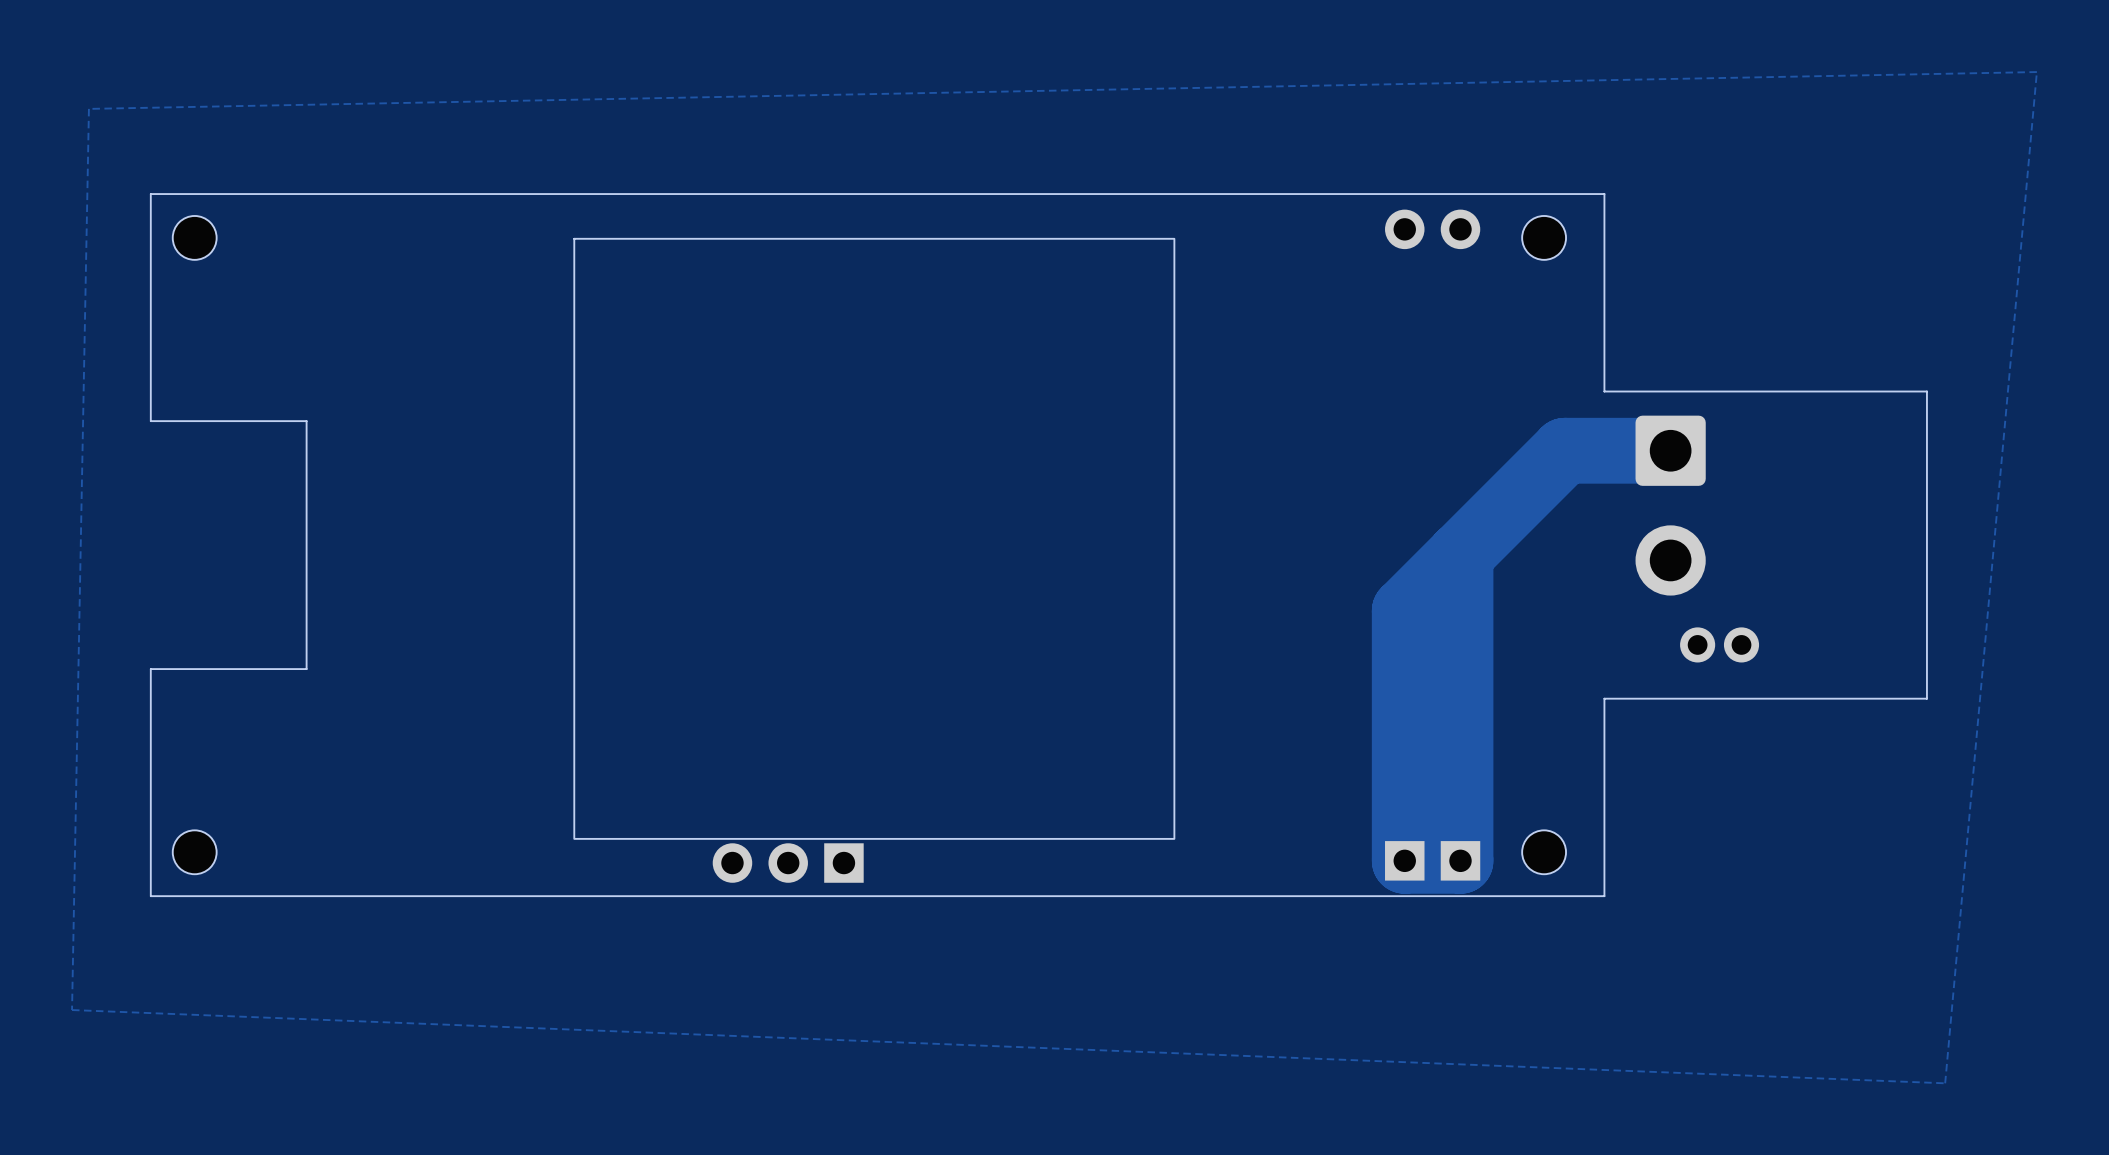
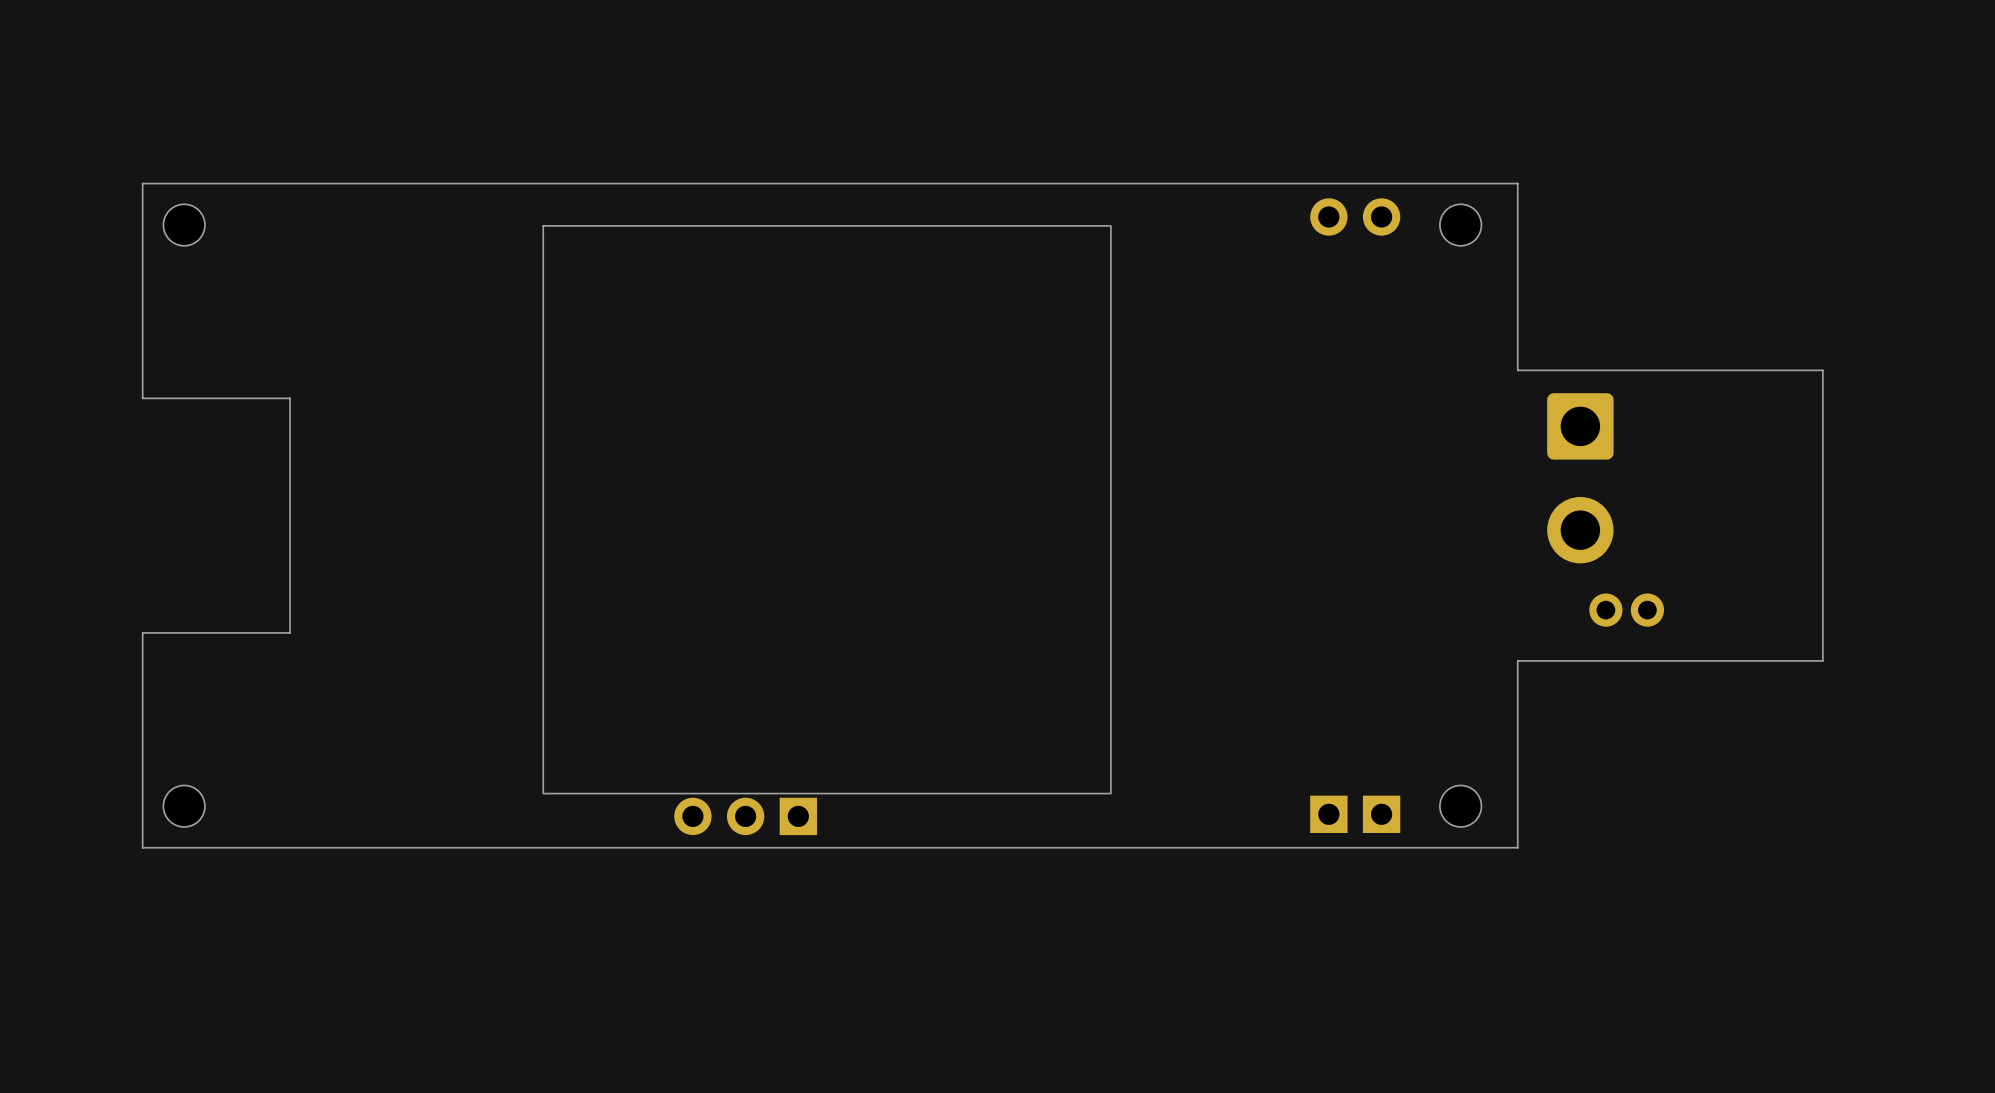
zone outline: (2036, 72) (88, 108) (72, 1010) (1945, 1083) (2036, 72) -> none
track: (1670, 450) (1564, 450) (1404, 610) (1404, 860) (1460, 860) (1460, 554) -> none

